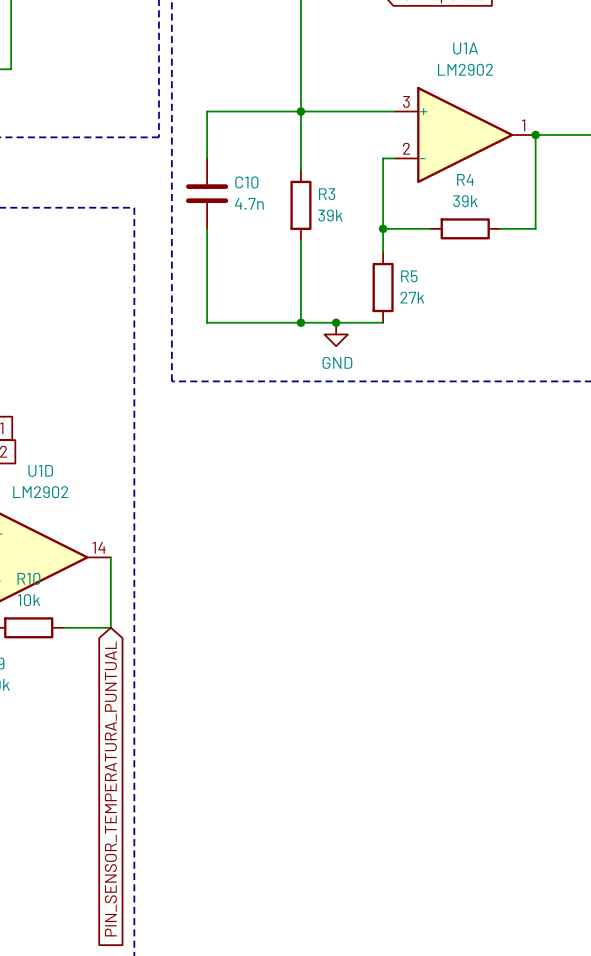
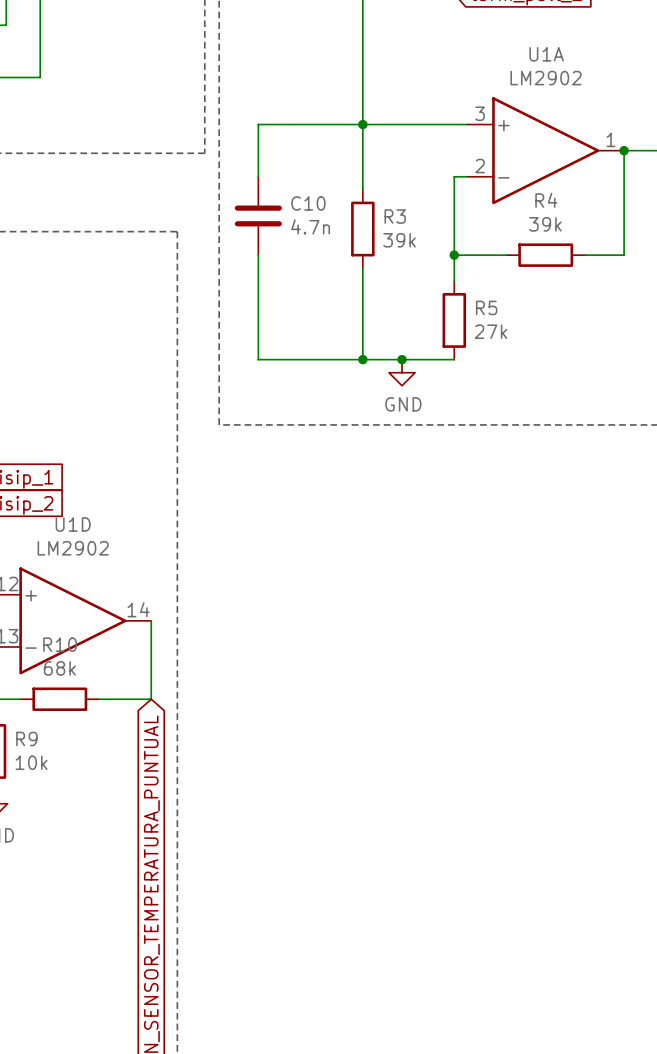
R10 value: 10k (28, 600) -> 68k (59, 668)

